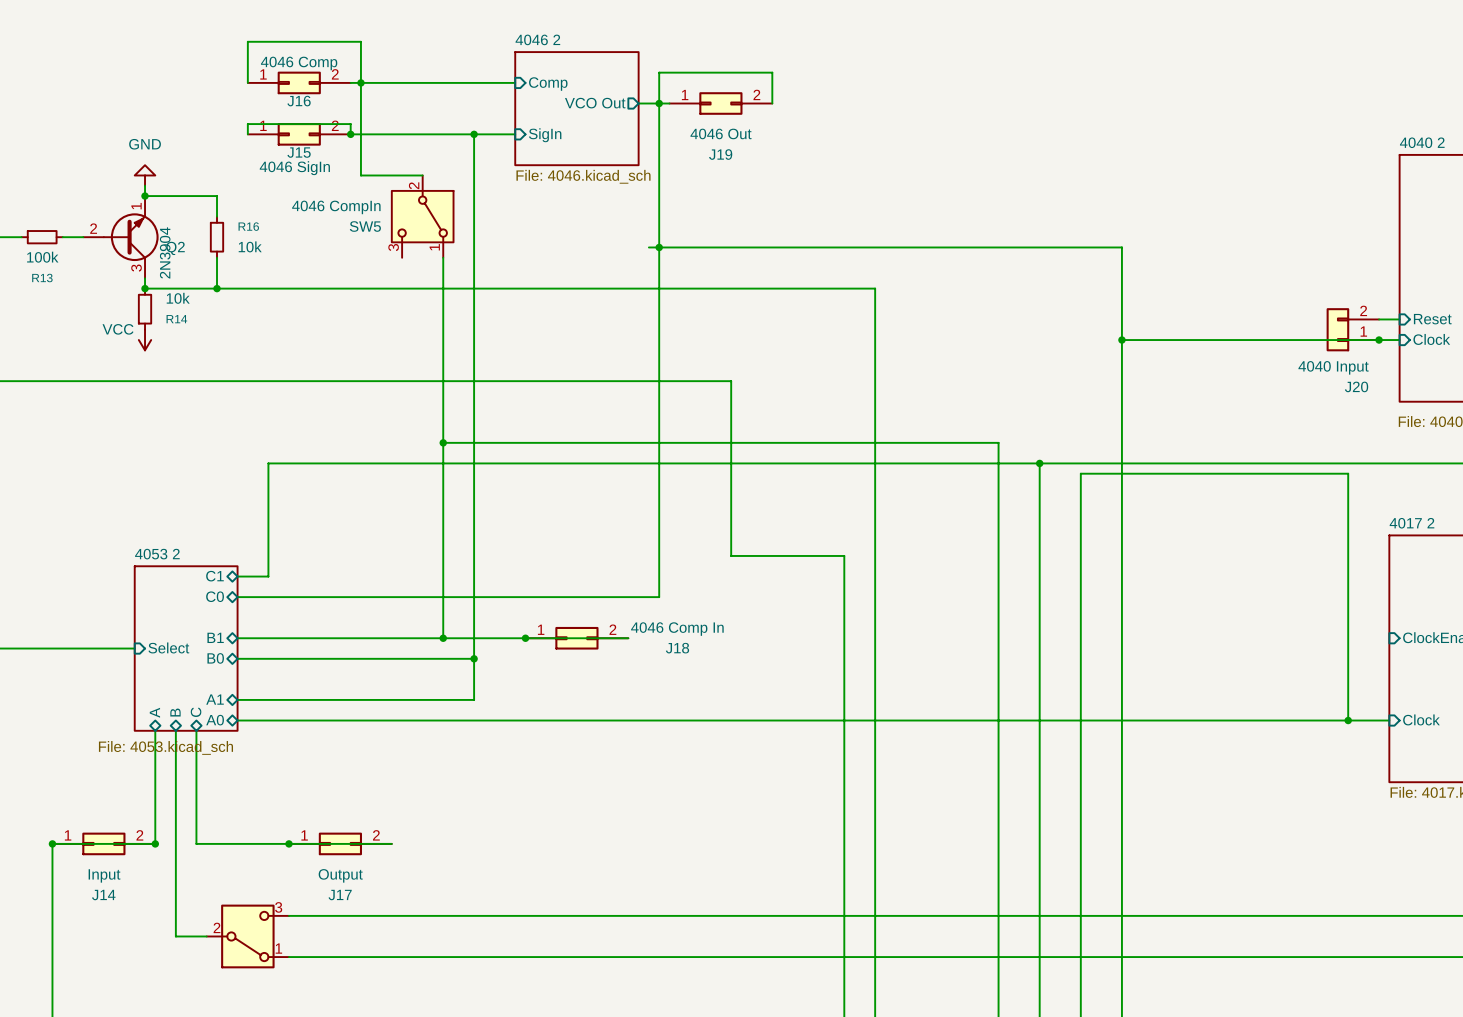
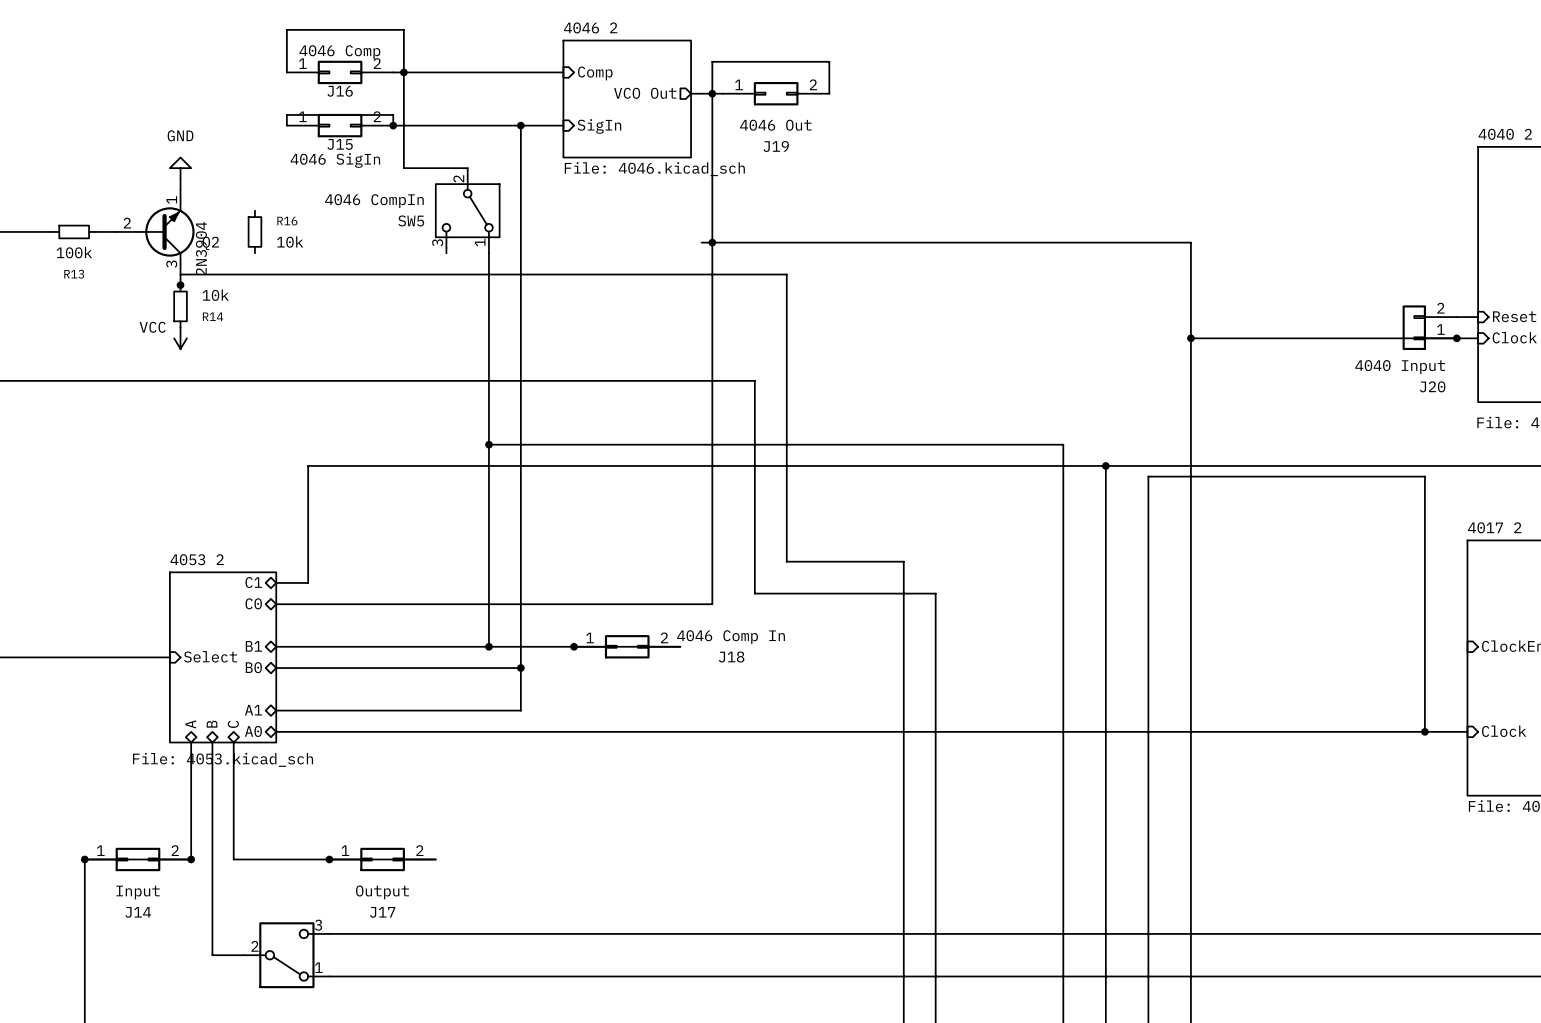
wire: (145, 196) (217, 196) (217, 216) -> none
junction: (145, 196) -> none
wire: (217, 257) (217, 288) -> none
wire: none -> (180, 274) (786, 274) (786, 380)
wire: (145, 288) (875, 288) (875, 586) -> none
junction: (217, 288) -> none
wire: (700, 381) (731, 381) -> (754, 380) (754, 593) (935, 593)

